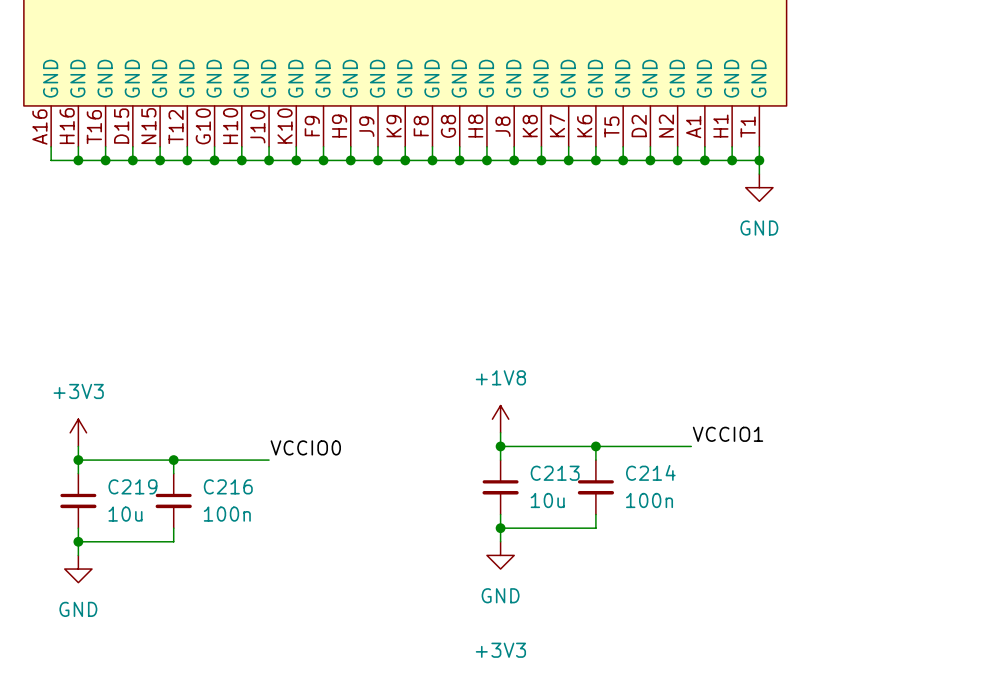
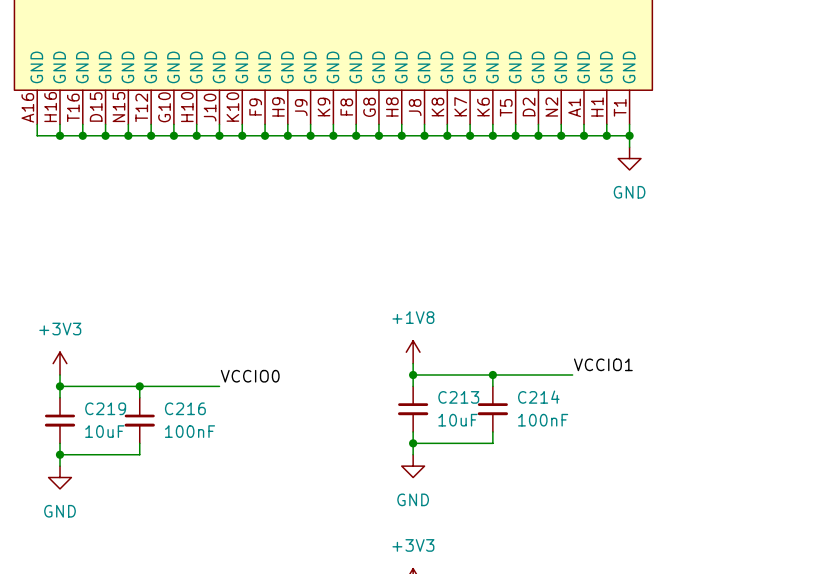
C213 value: 10u (547, 500) -> 10uF (457, 420)
C214 value: 100n (649, 500) -> 100nF (543, 420)
C219 value: 10u (125, 514) -> 10uF (104, 431)
C216 value: 100n (227, 514) -> 100nF (190, 431)

